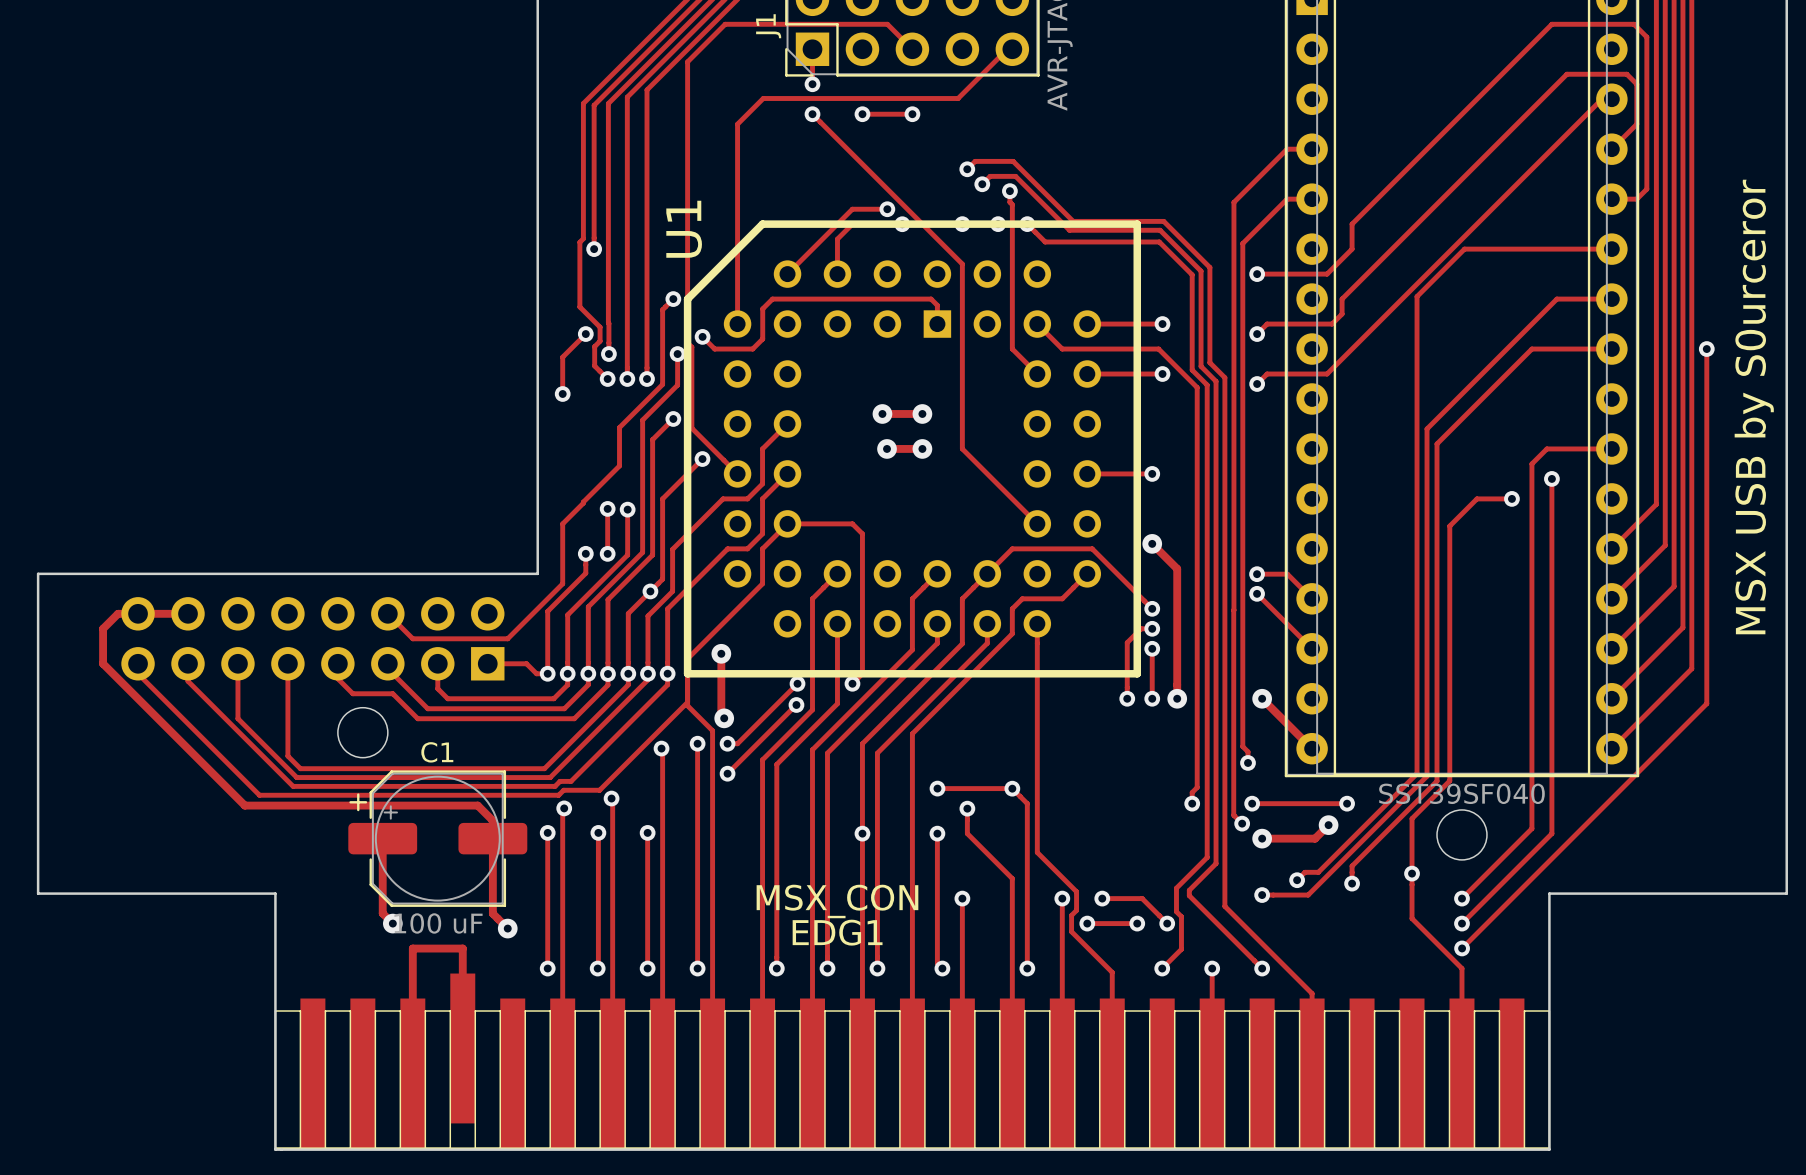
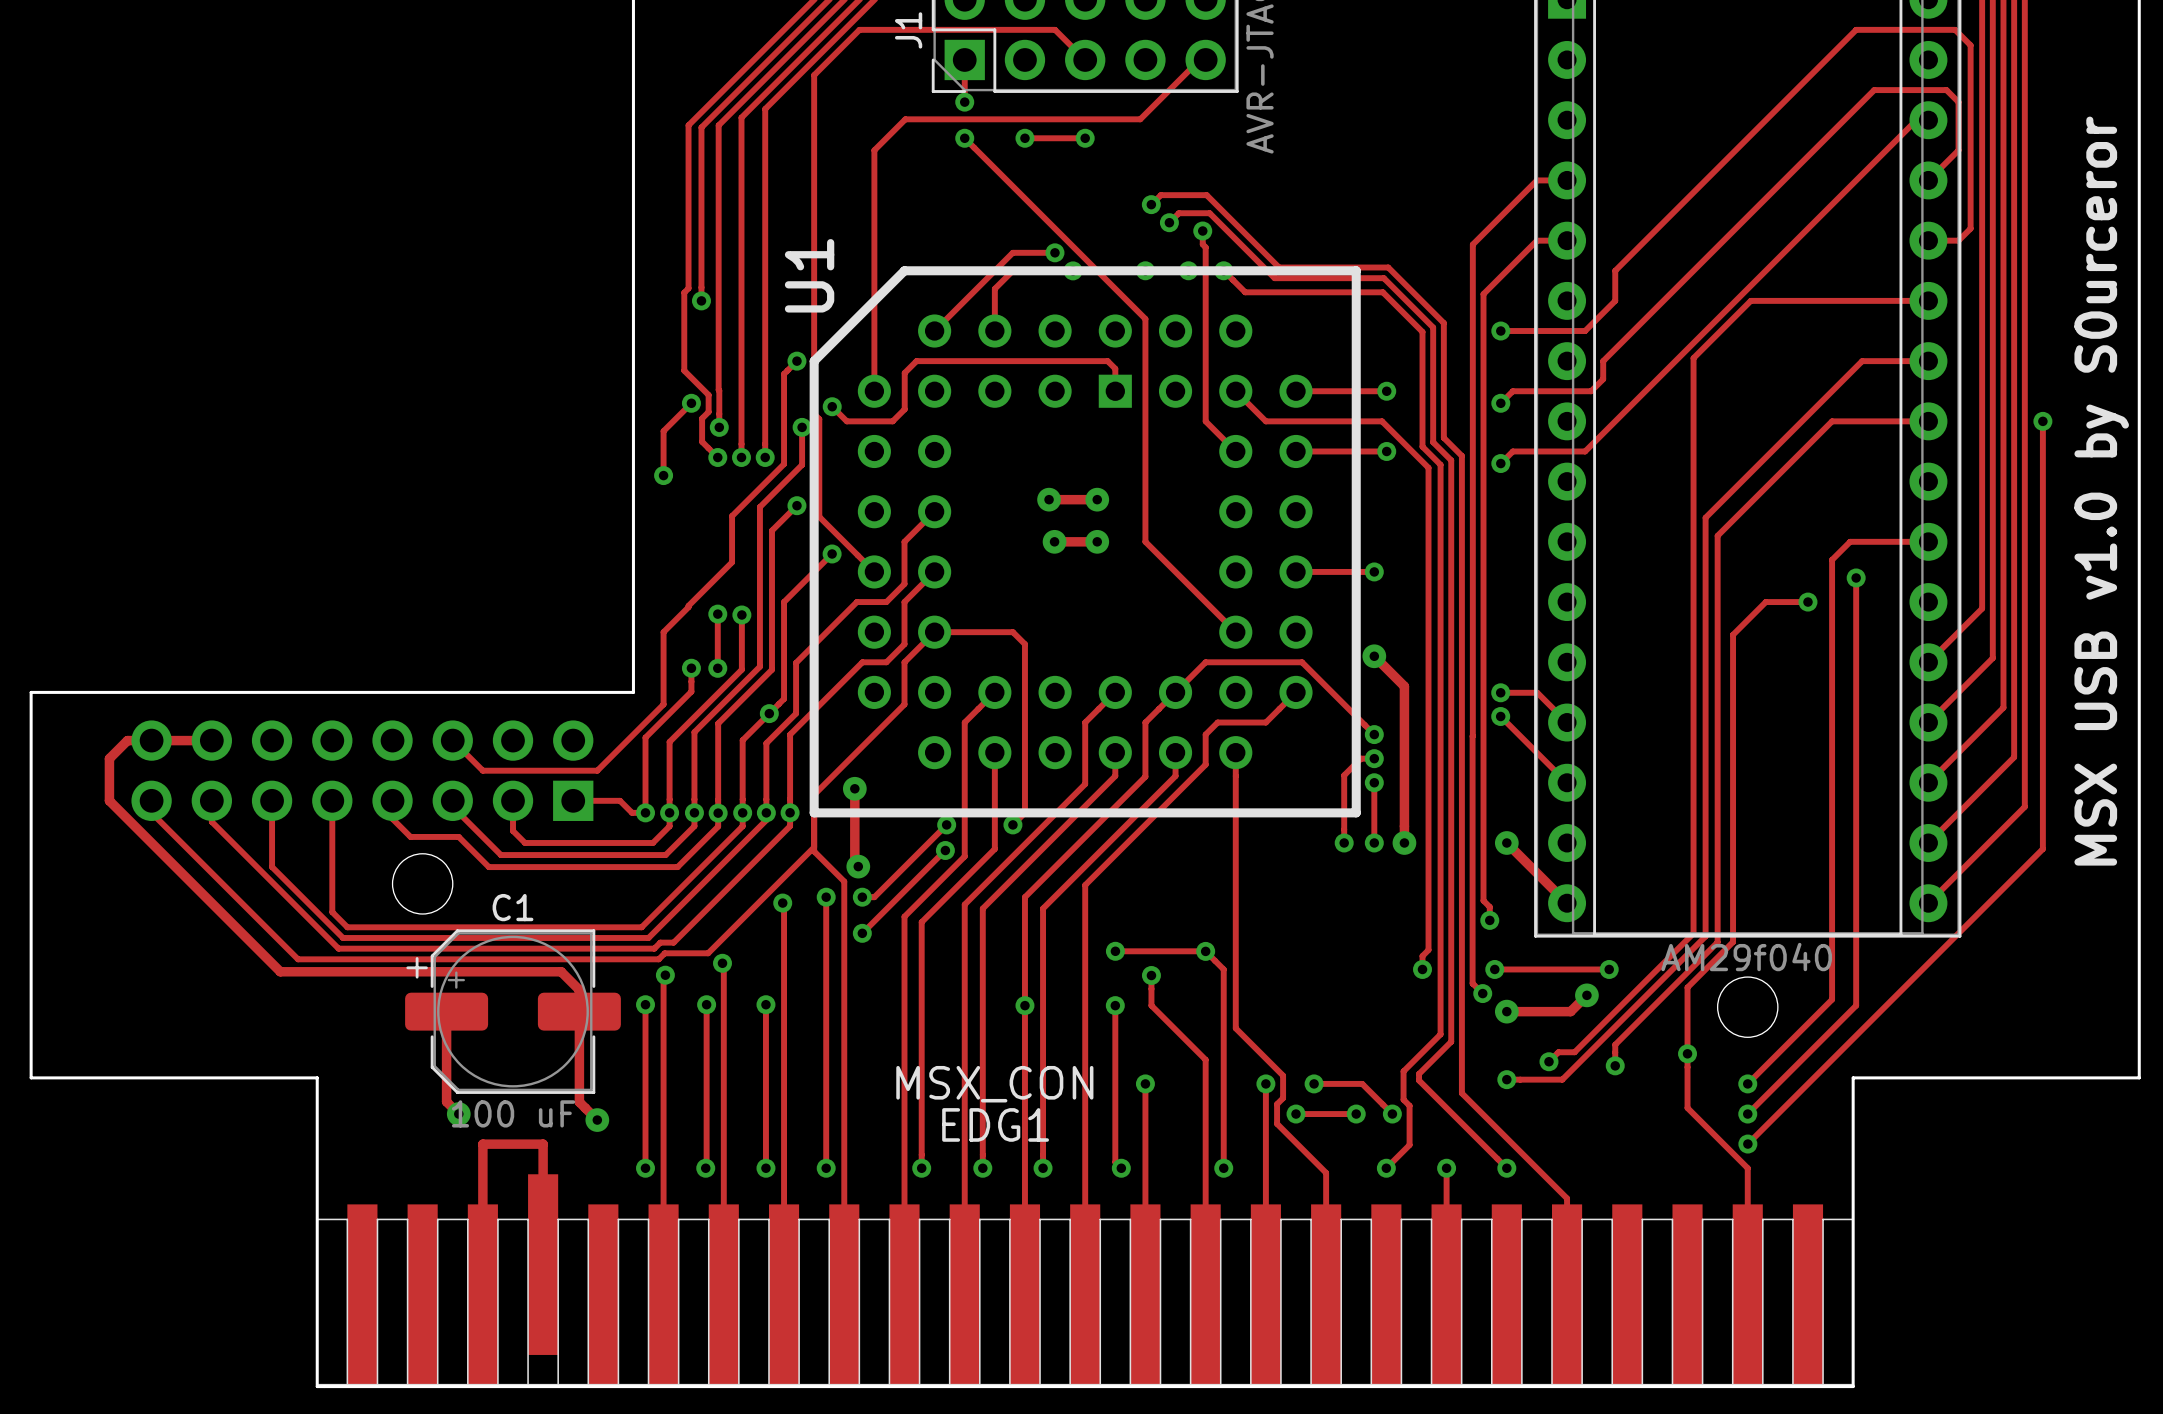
text: MSX USB by S0urceror (1754, 407) -> MSX USB v1.0 by S0urceror (2101, 491)
part value: SST39SF040 (1461, 793) -> AM29f040 (1746, 957)

